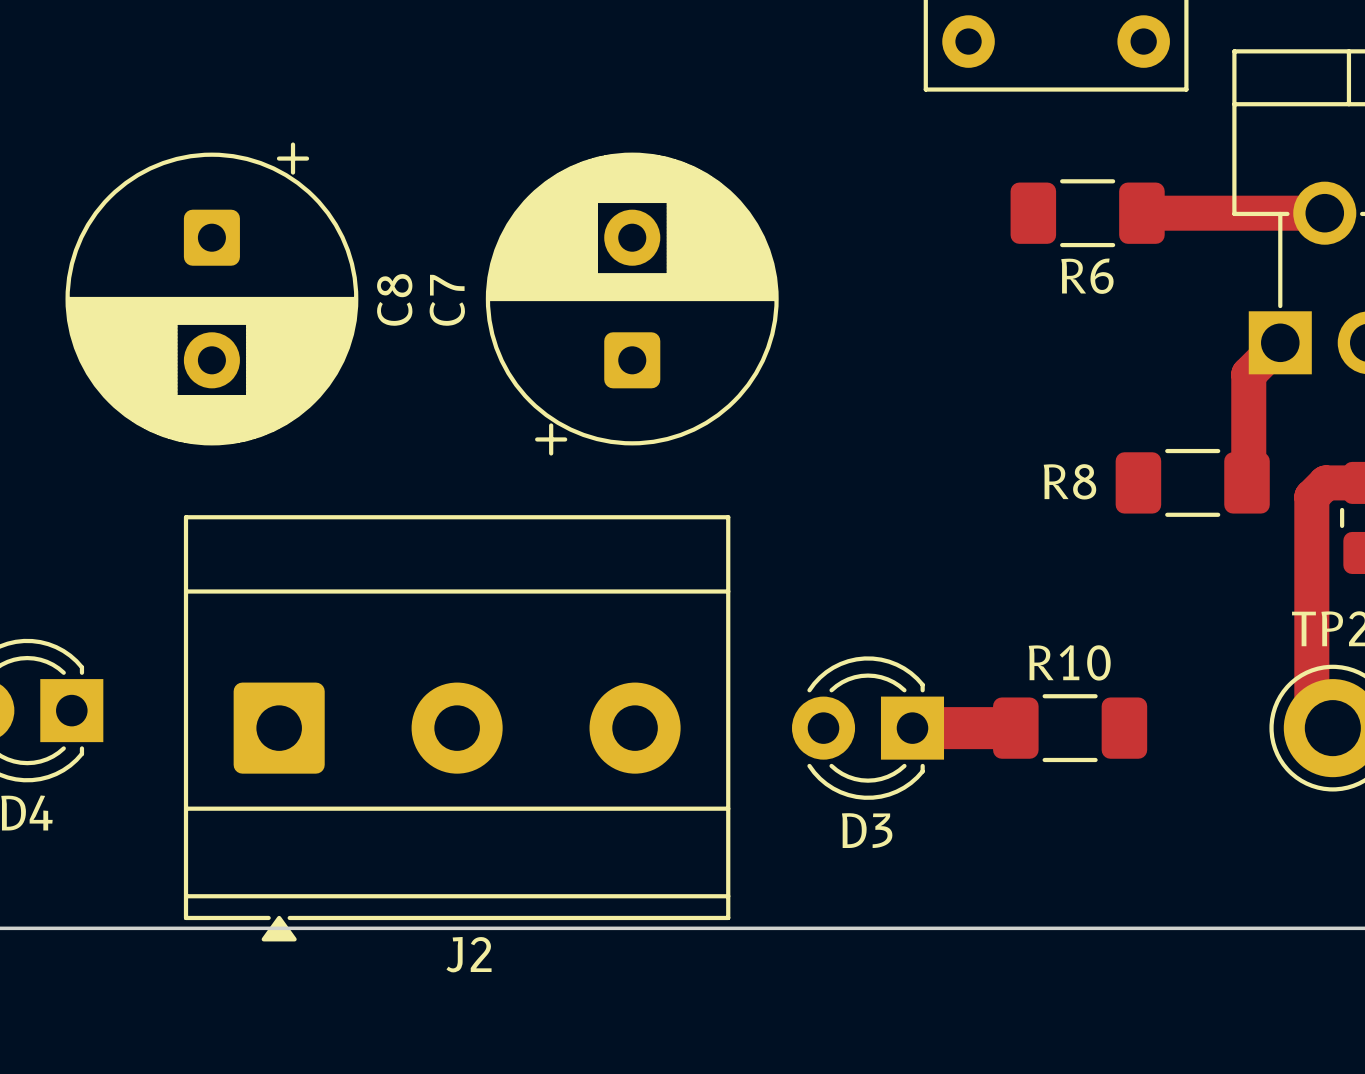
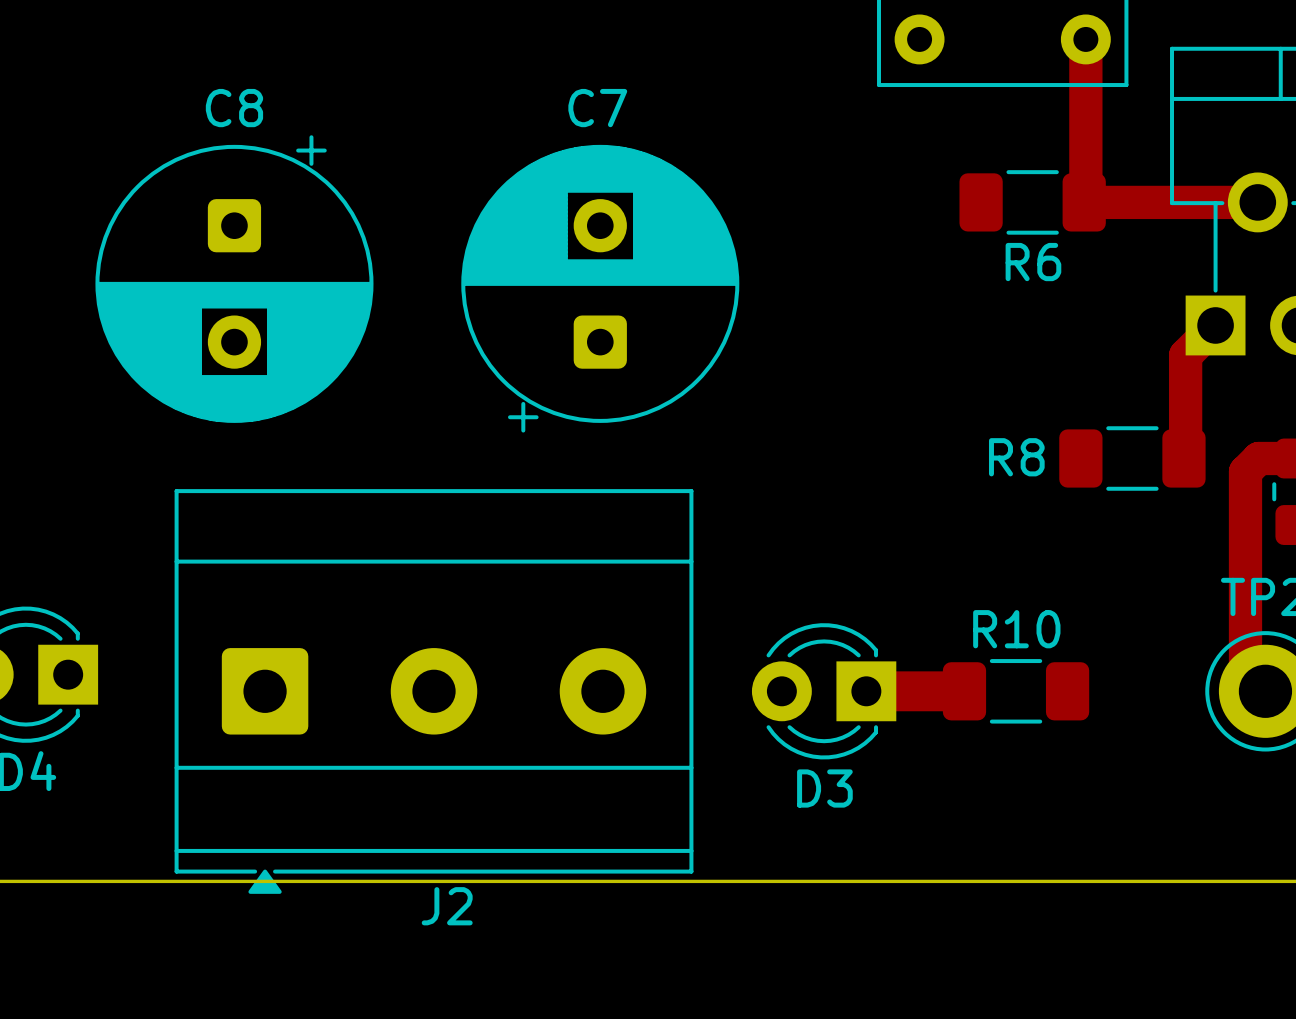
track: none -> (1085, 39) (1085, 200) (1084, 202)
C8 position: (211, 293) -> (234, 279)
C8 name rotation: 0° (394, 299) -> 90° clockwise (234, 108)
C8 name position: C8 (394, 299) -> C8 (234, 108)
C7 name rotation: 0° (447, 300) -> 90° clockwise (597, 108)
C7 name position: C7 (447, 300) -> C7 (597, 108)

